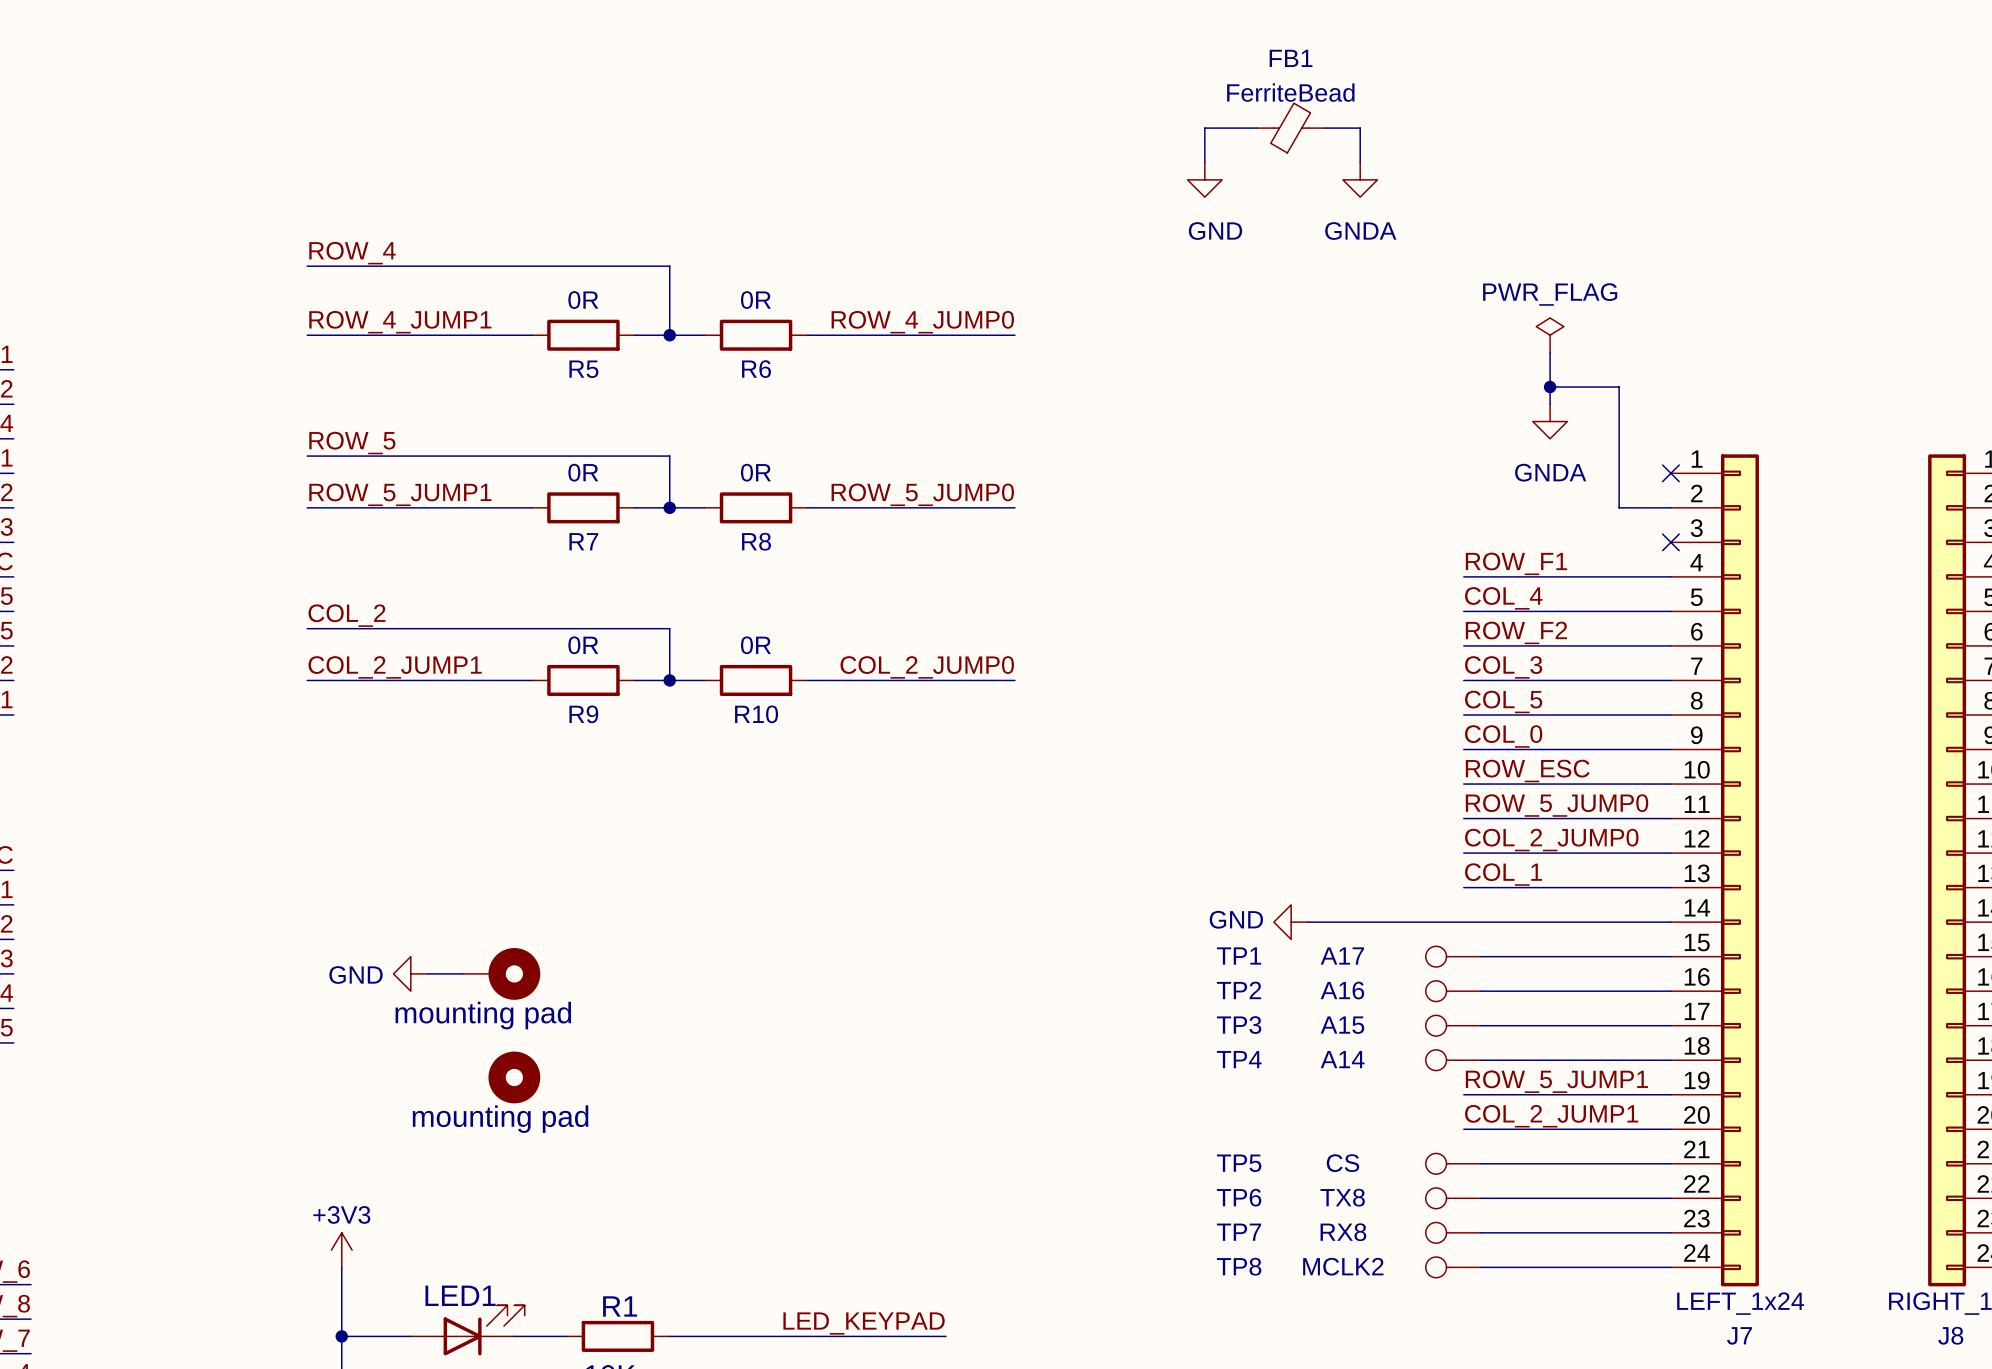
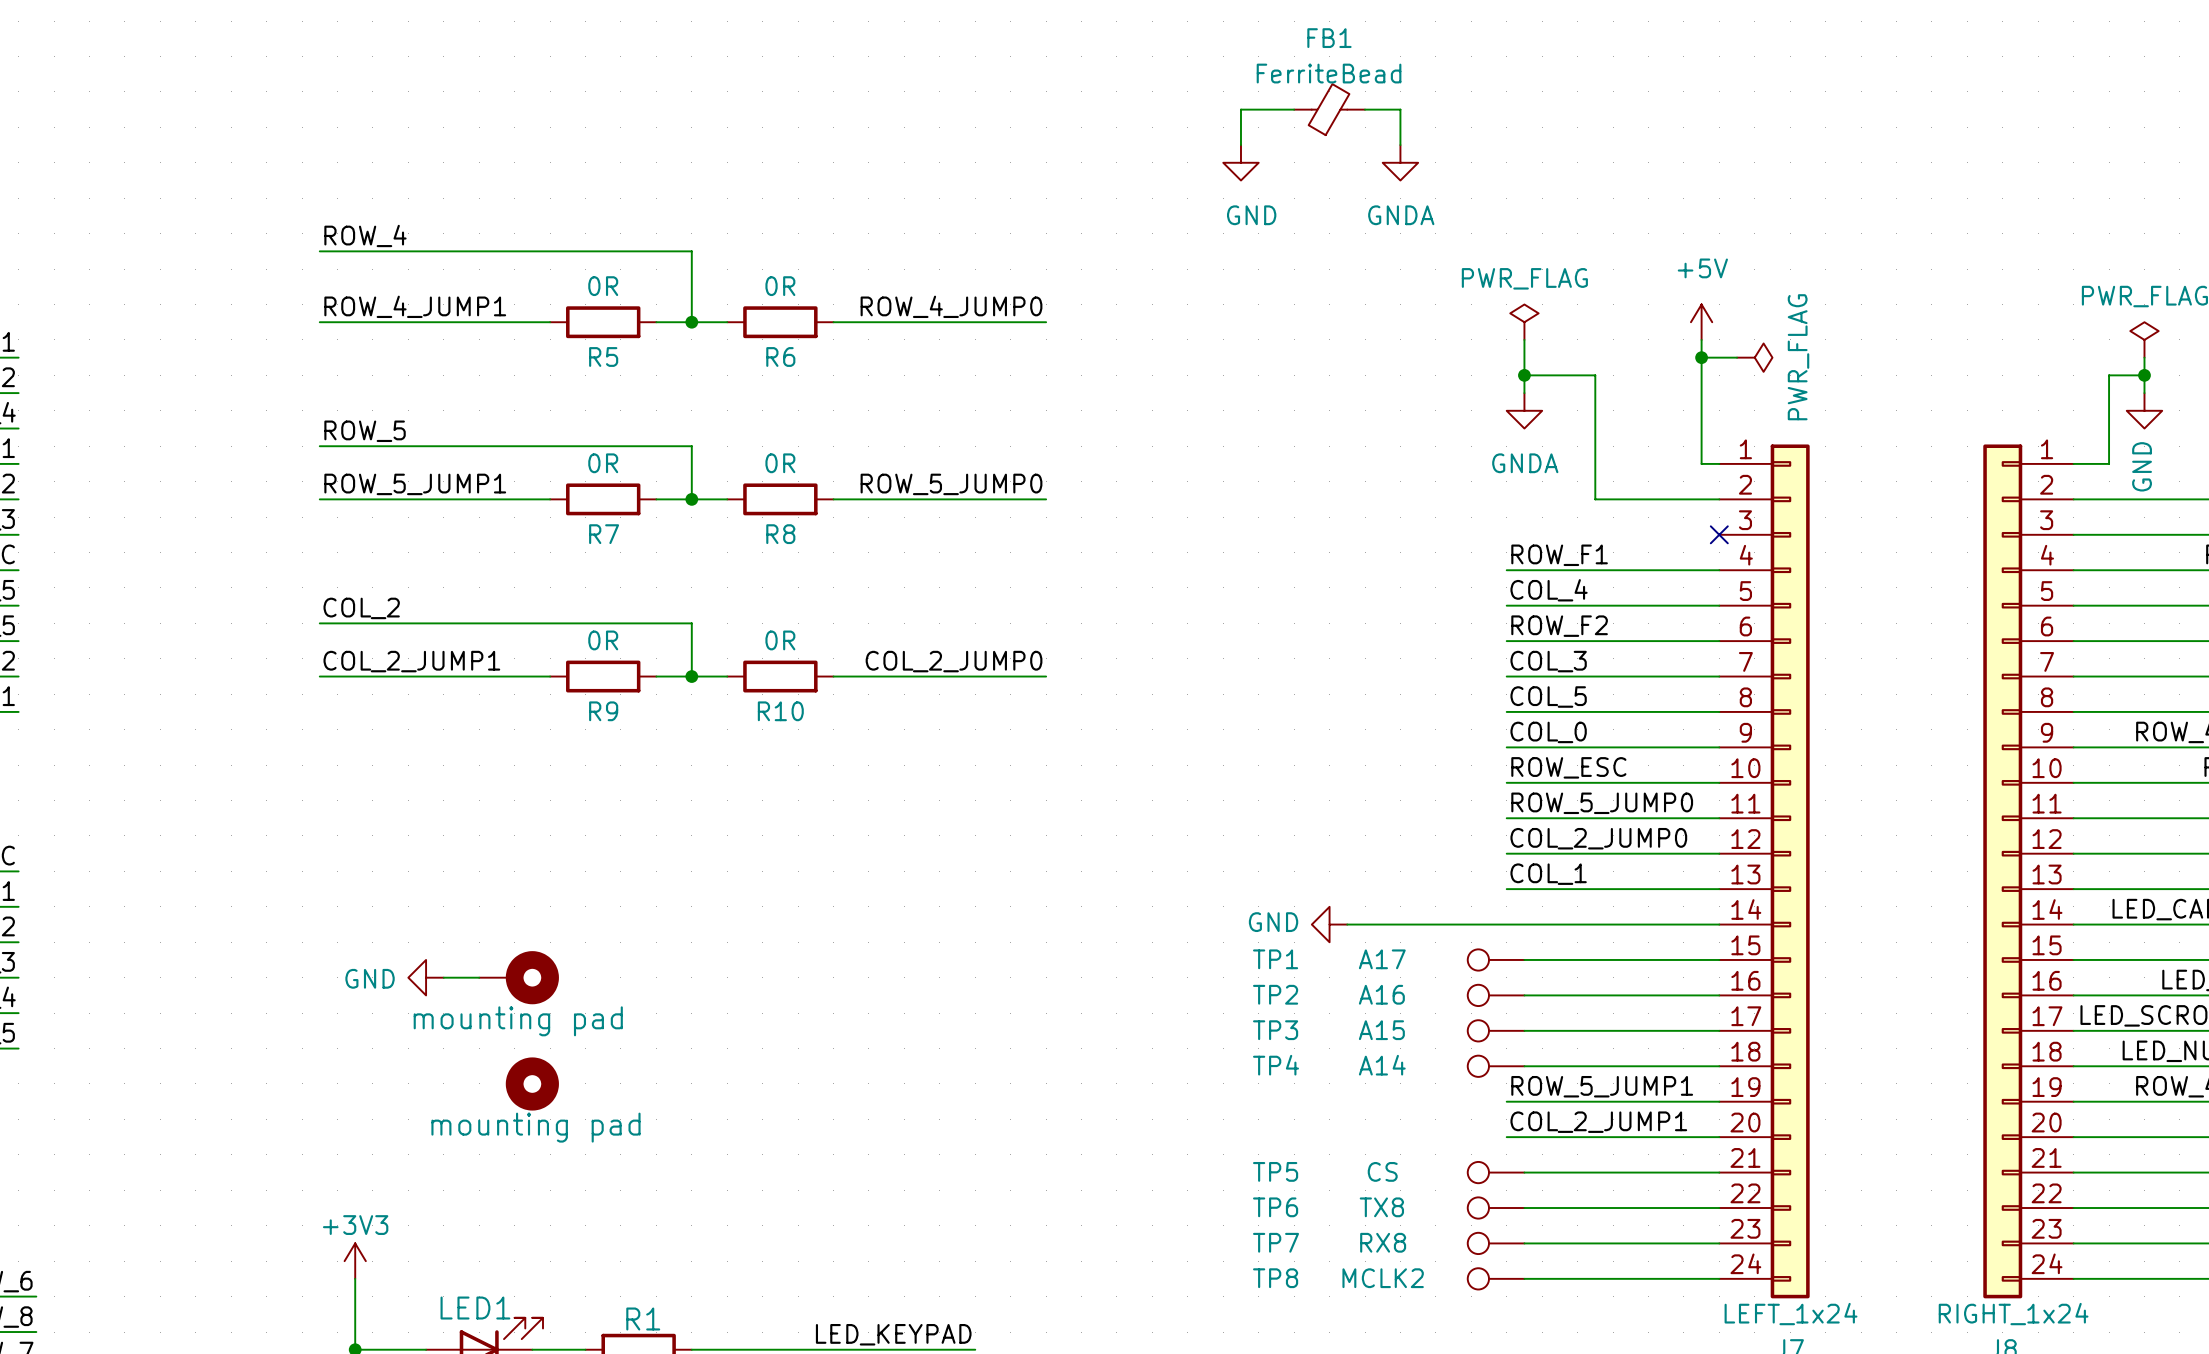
power symbol position: PWR_FLAG (1550, 335) -> PWR_FLAG (1524, 322)
power symbol: none -> +5V (1701, 322)
wire: none -> (1524, 339) (1524, 393)
wire: (1550, 352) (1550, 387) (1619, 387) (1619, 507) -> (1595, 393) (1595, 499) (1666, 499)
wire: none -> (1701, 339) (1701, 463) (1719, 463)
wire: none -> (1701, 357) (1737, 357)
junction: none -> (1701, 357)
power symbol: none -> PWR_FLAG (1754, 357)
wire: none -> (1524, 375) (1595, 375)
junction: none -> (1524, 375)
junction: (1550, 387) -> none
power symbol position: GNDA (1550, 421) -> GNDA (1524, 410)
no-connect mark: (1670, 473) -> none

